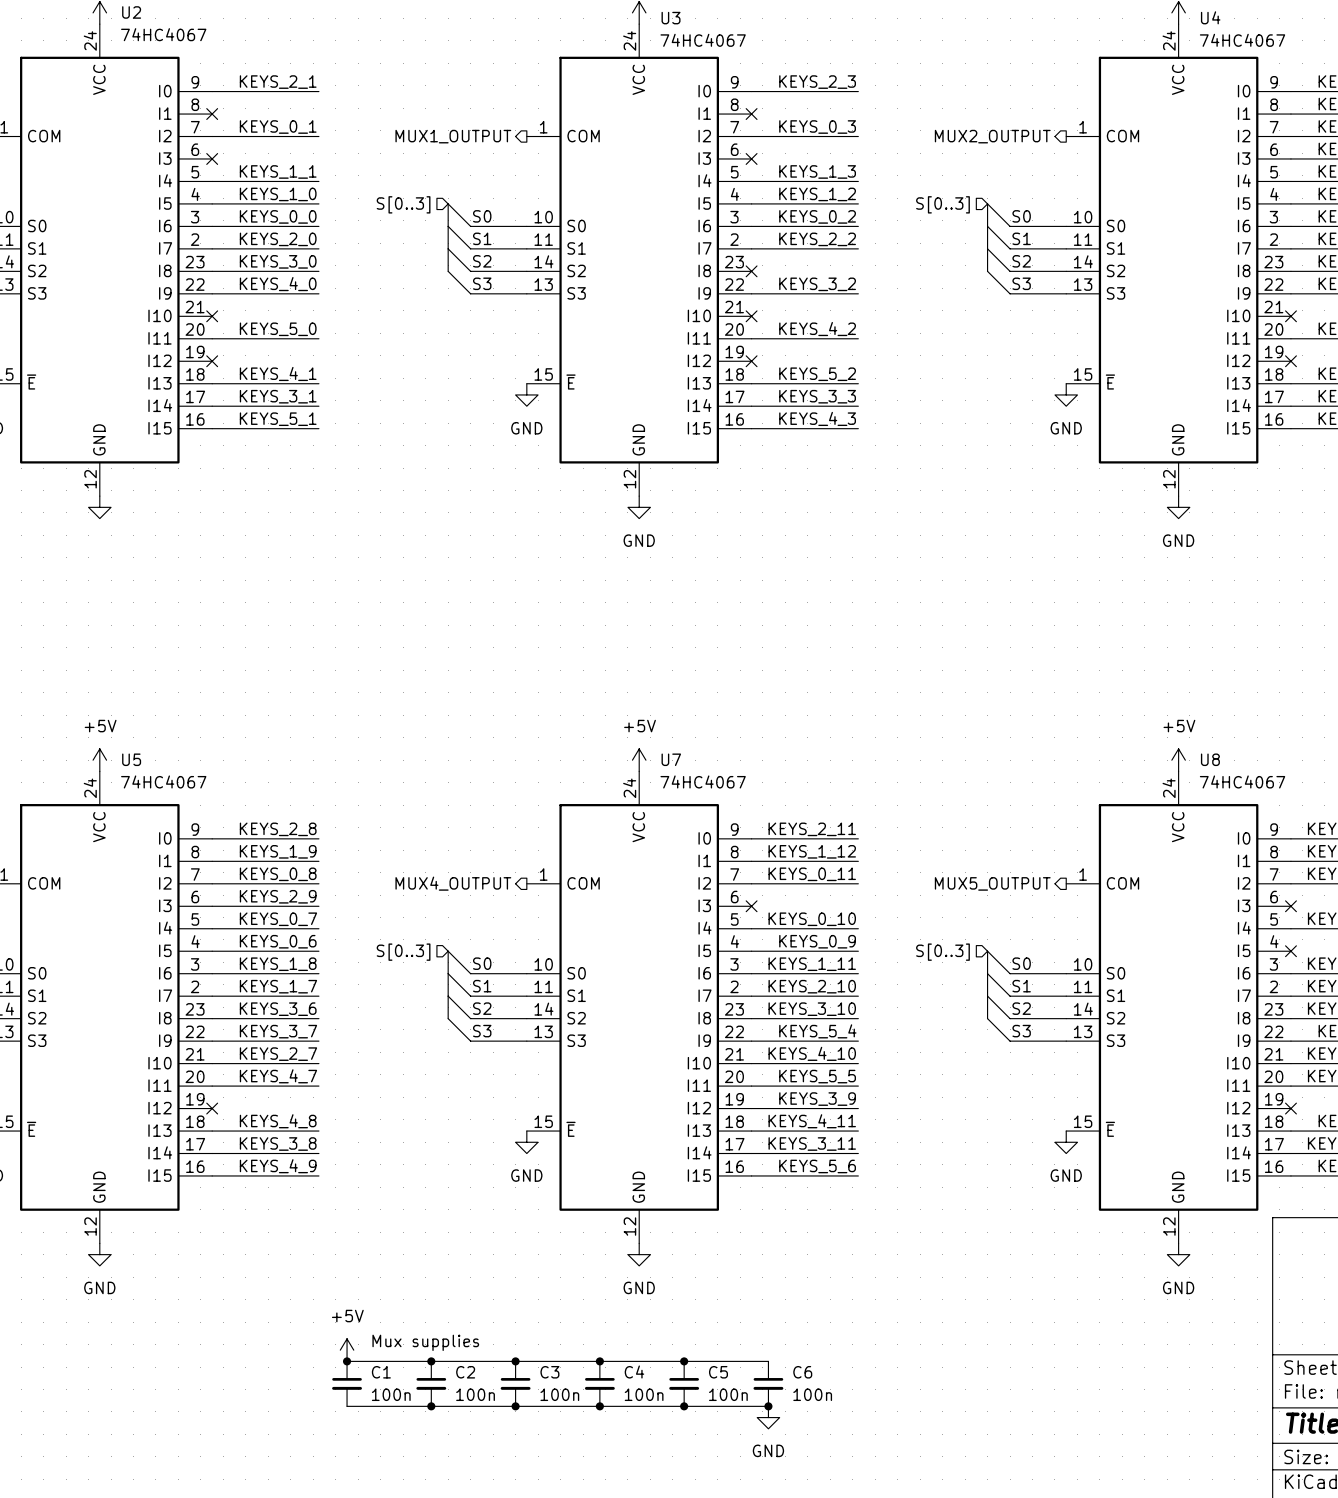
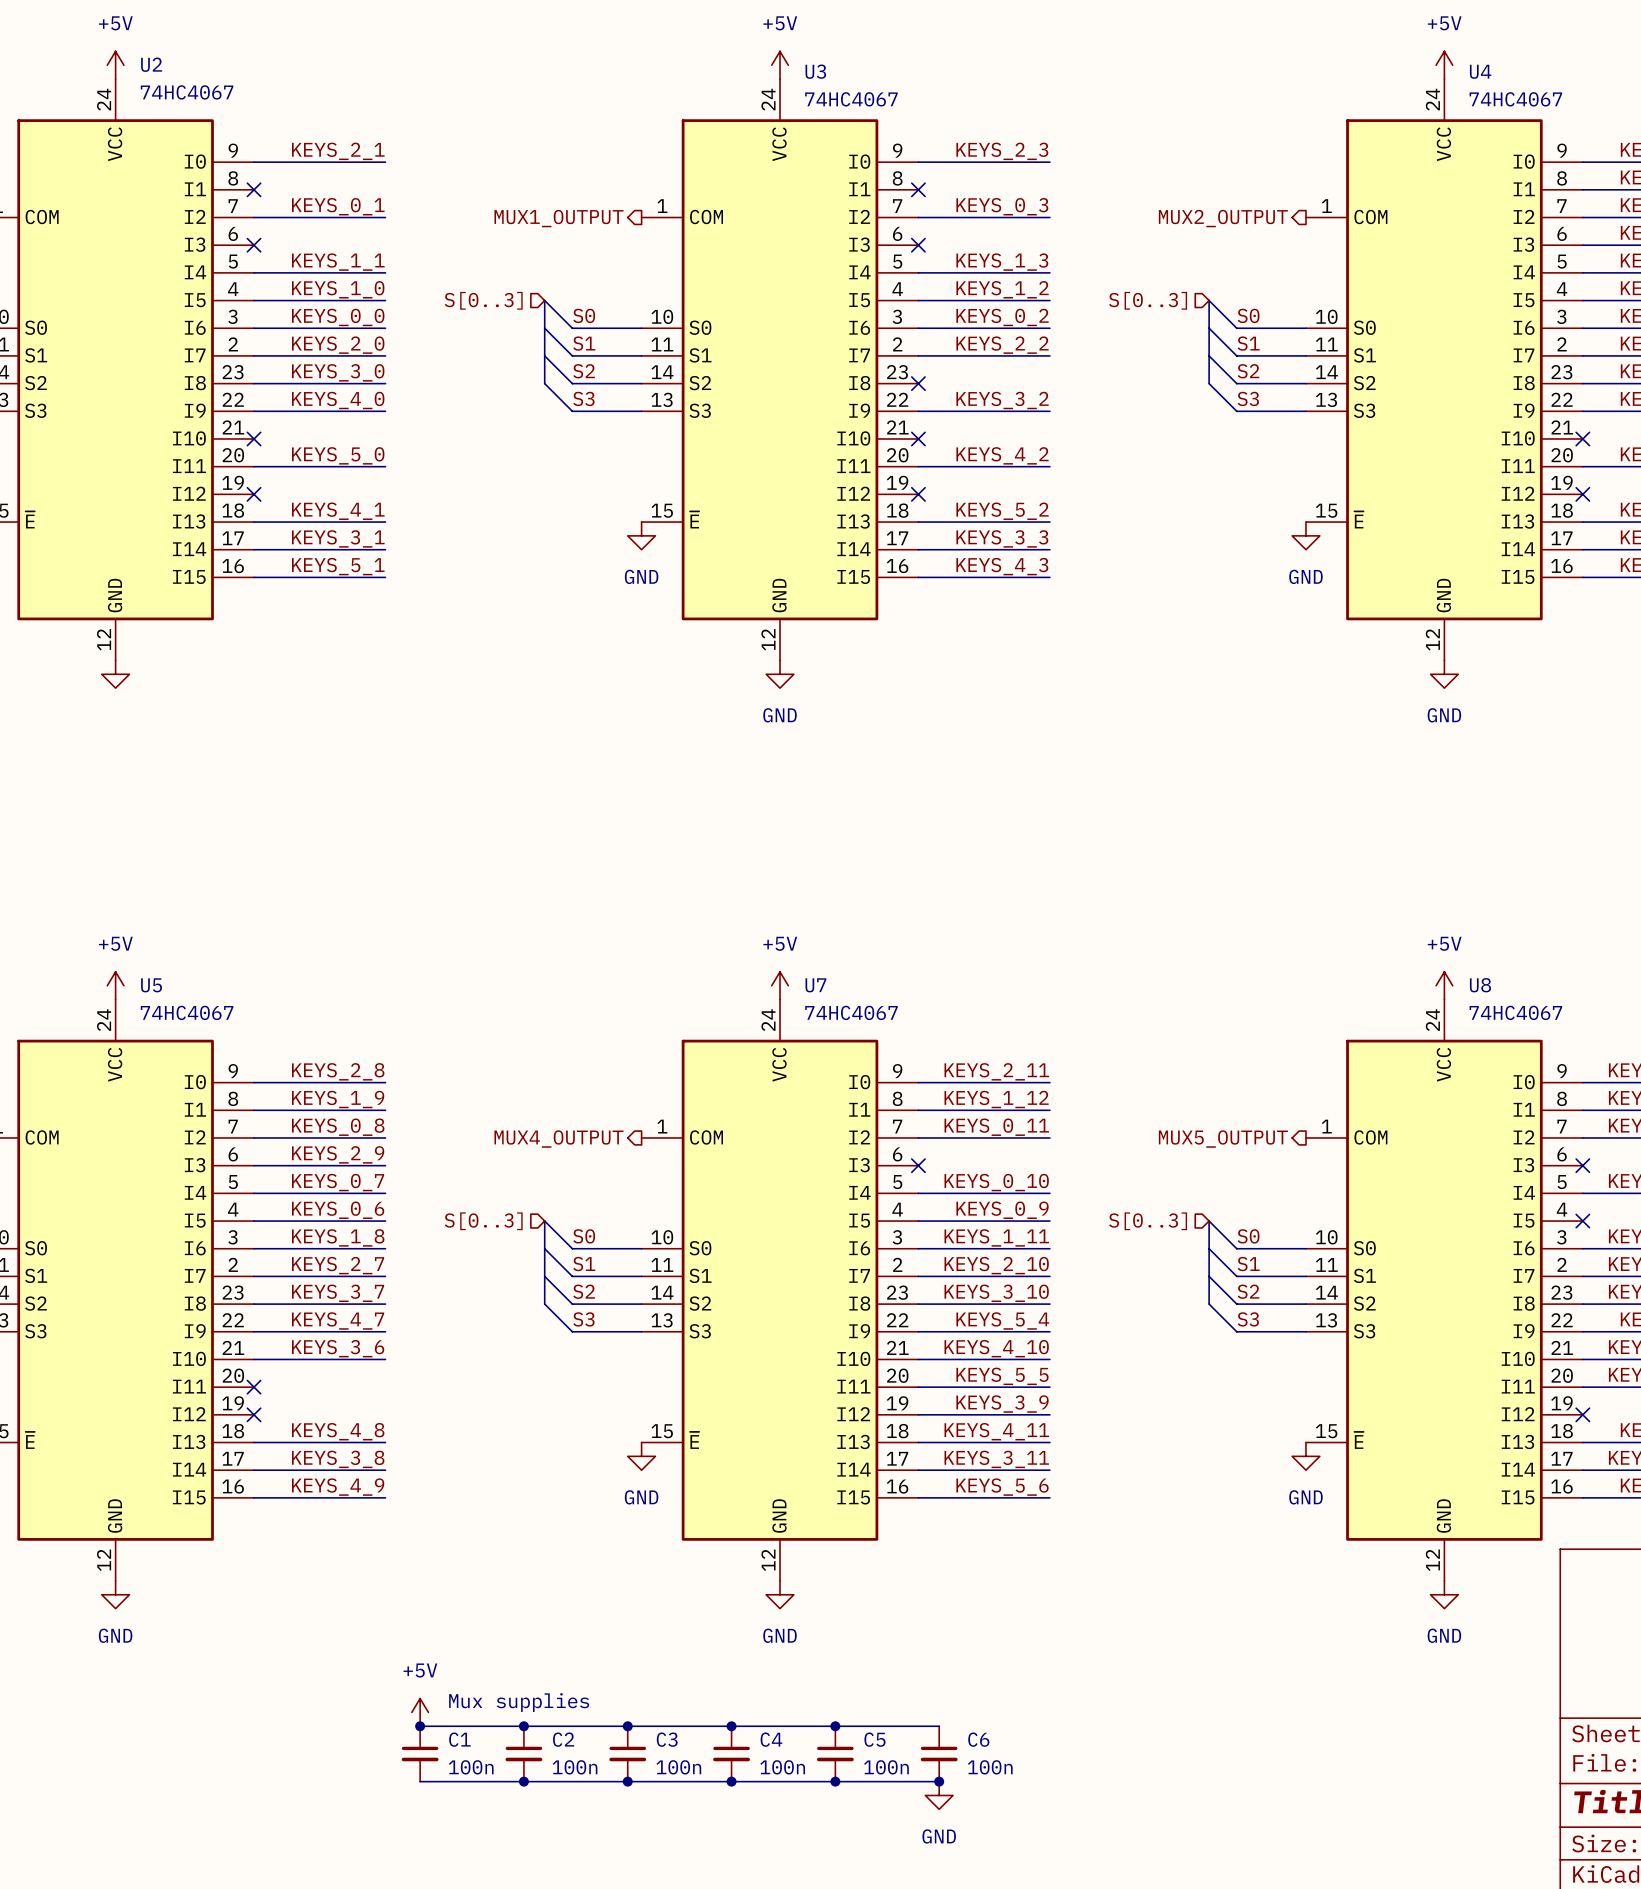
label: KEYS_1_7 (278, 986) -> KEYS_2_7 (338, 1265)
label: KEYS_3_6 (278, 1009) -> KEYS_3_7 (338, 1293)
label: KEYS_3_7 (278, 1031) -> KEYS_4_7 (338, 1320)
label: KEYS_2_7 (278, 1054) -> KEYS_3_6 (338, 1348)
label: KEYS_4_7 (278, 1076) -> none
wire: (212, 1086) (318, 1086) -> none
no-connect mark: none -> (254, 1387)

